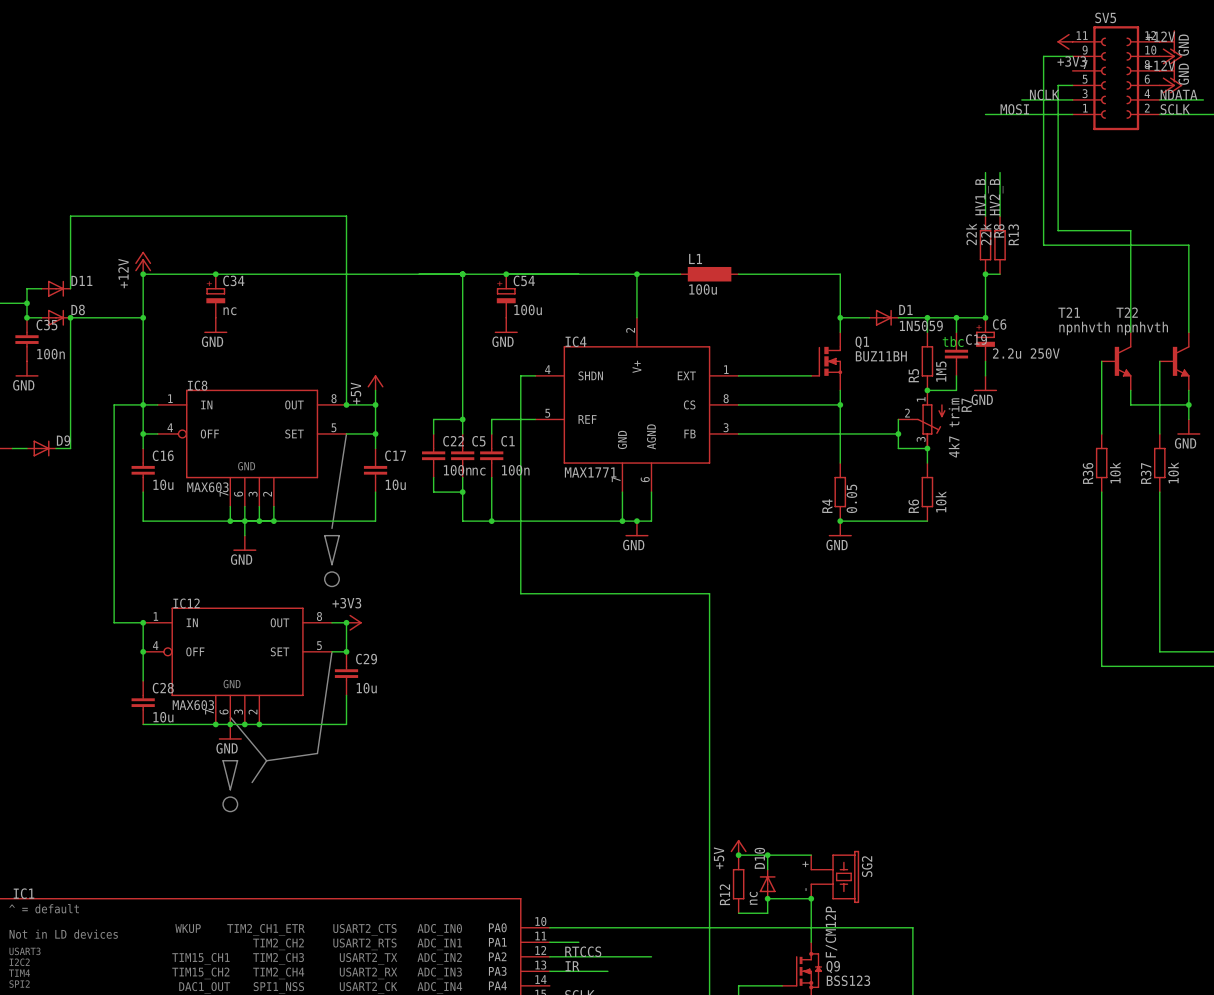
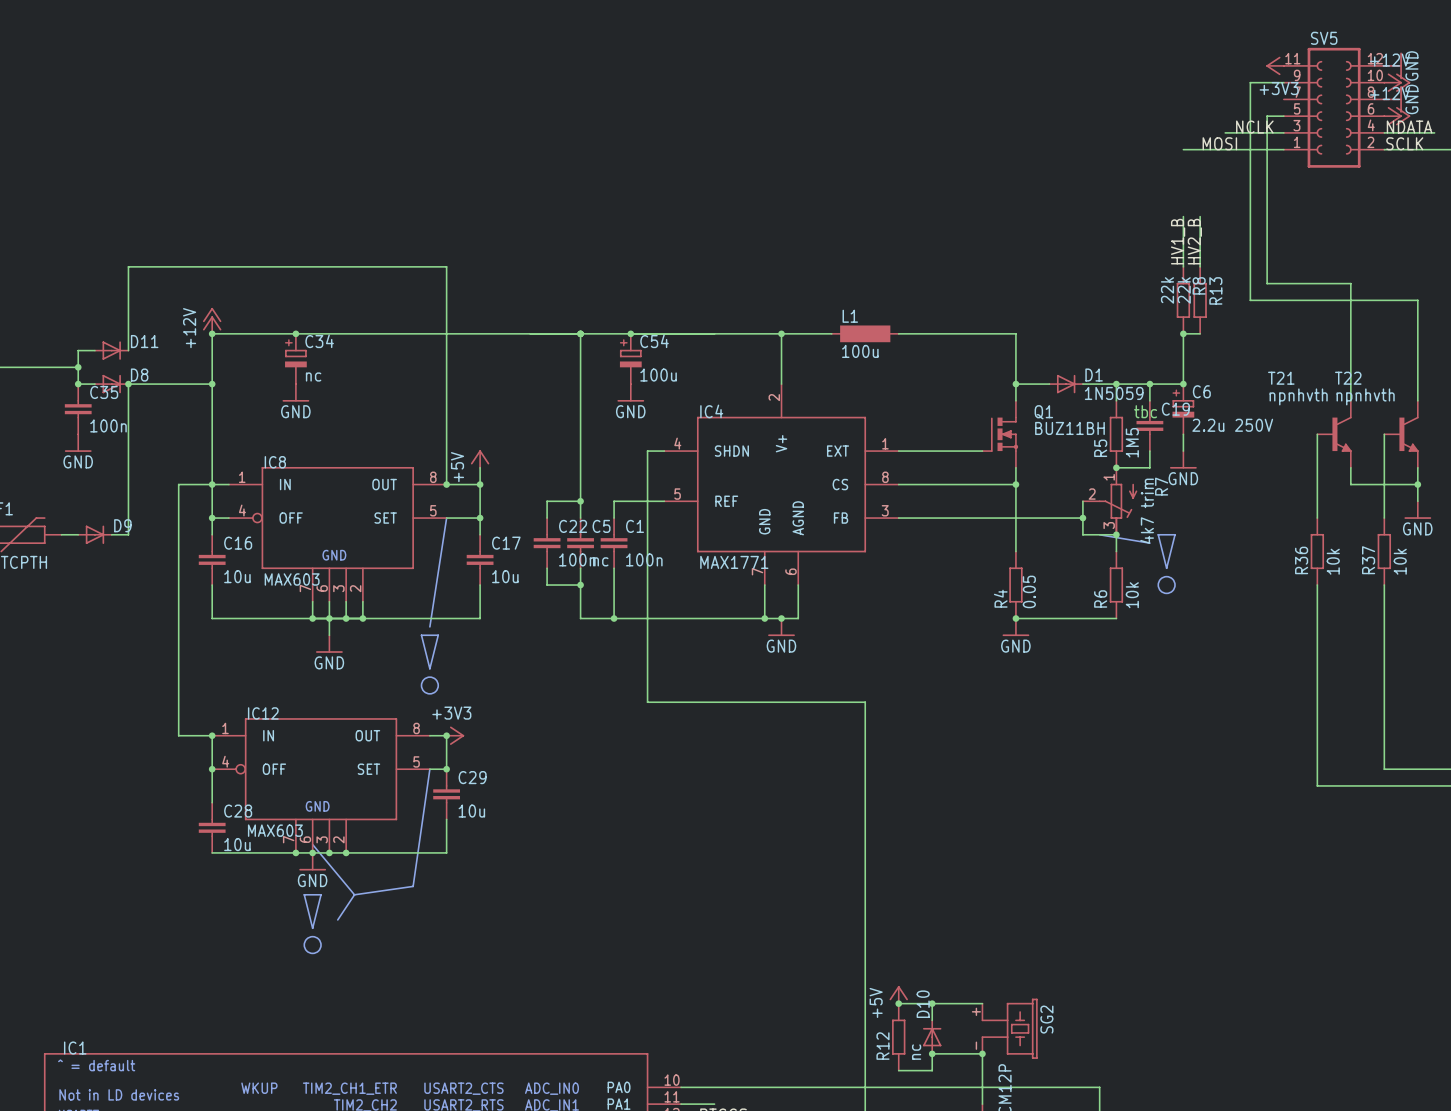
line: none -> (1099, 534) (1149, 543)
line: none -> (1158, 534) (1175, 534) (1166, 568) (1158, 534)
drawing: none -> [1157, 576, 1176, 594]

